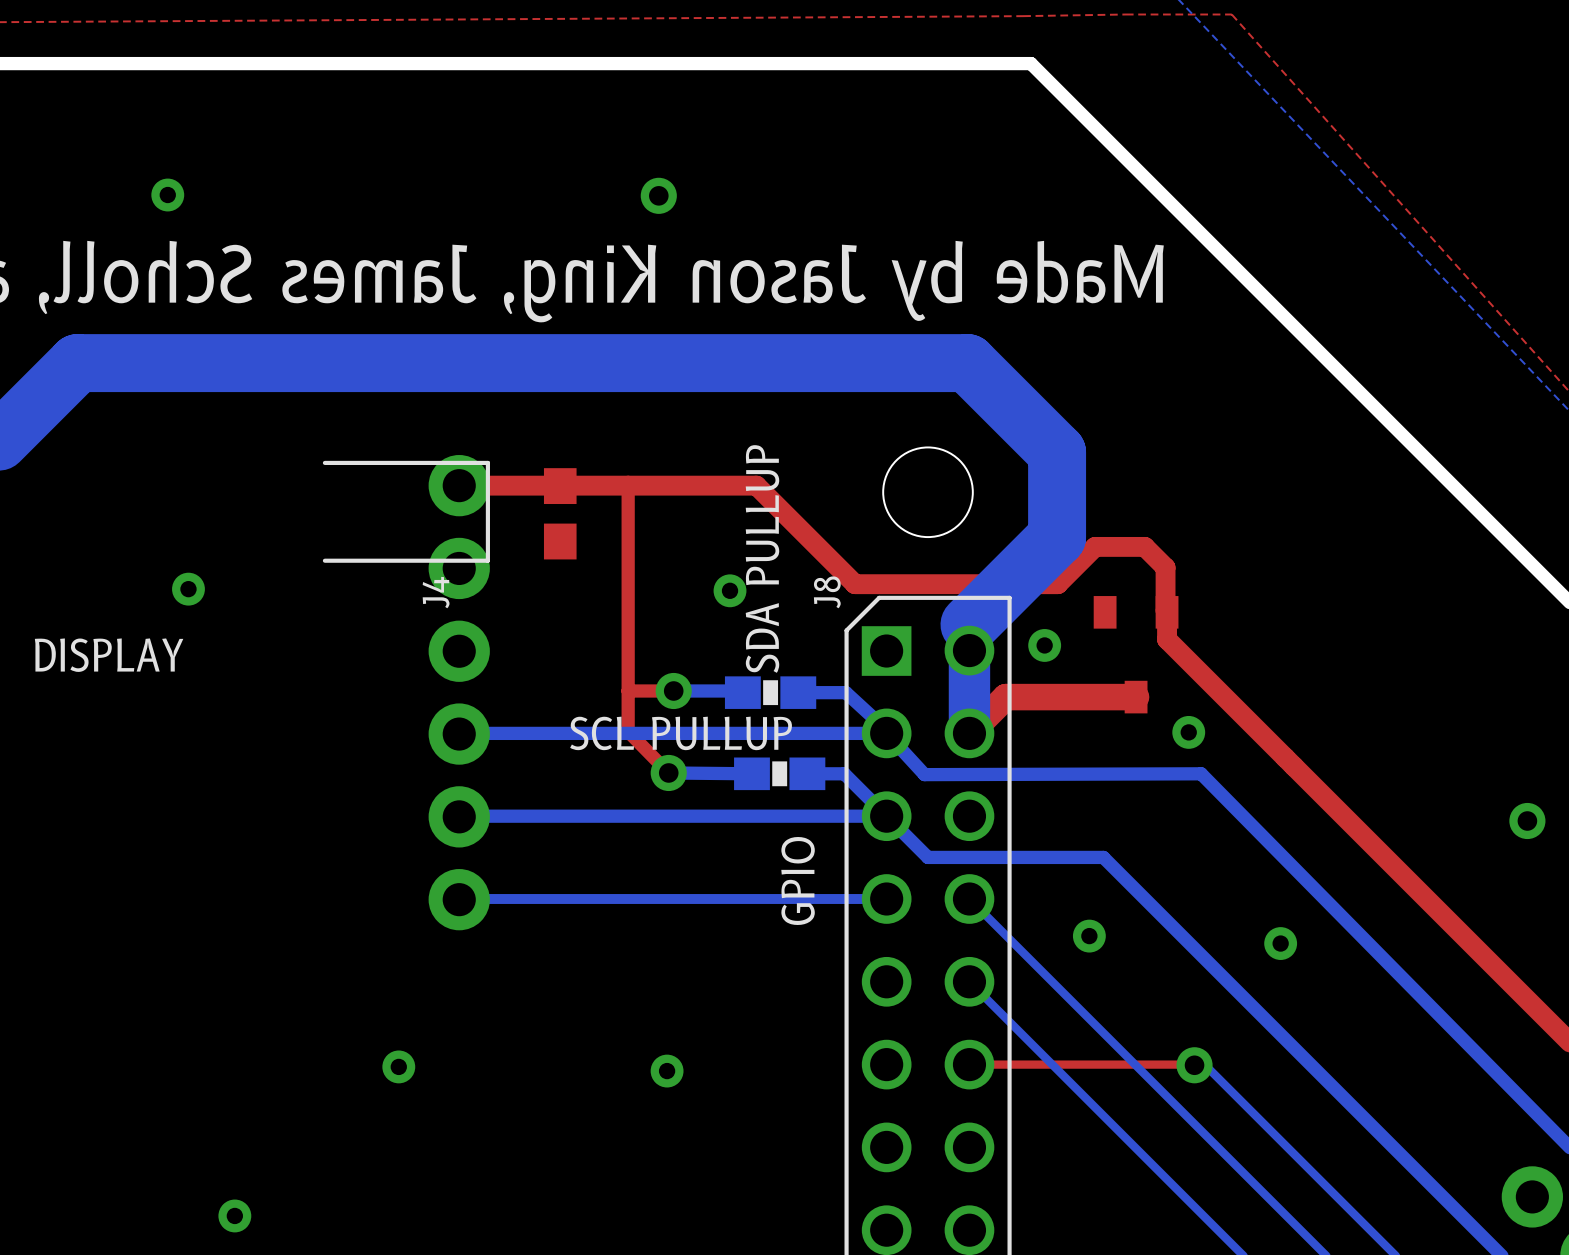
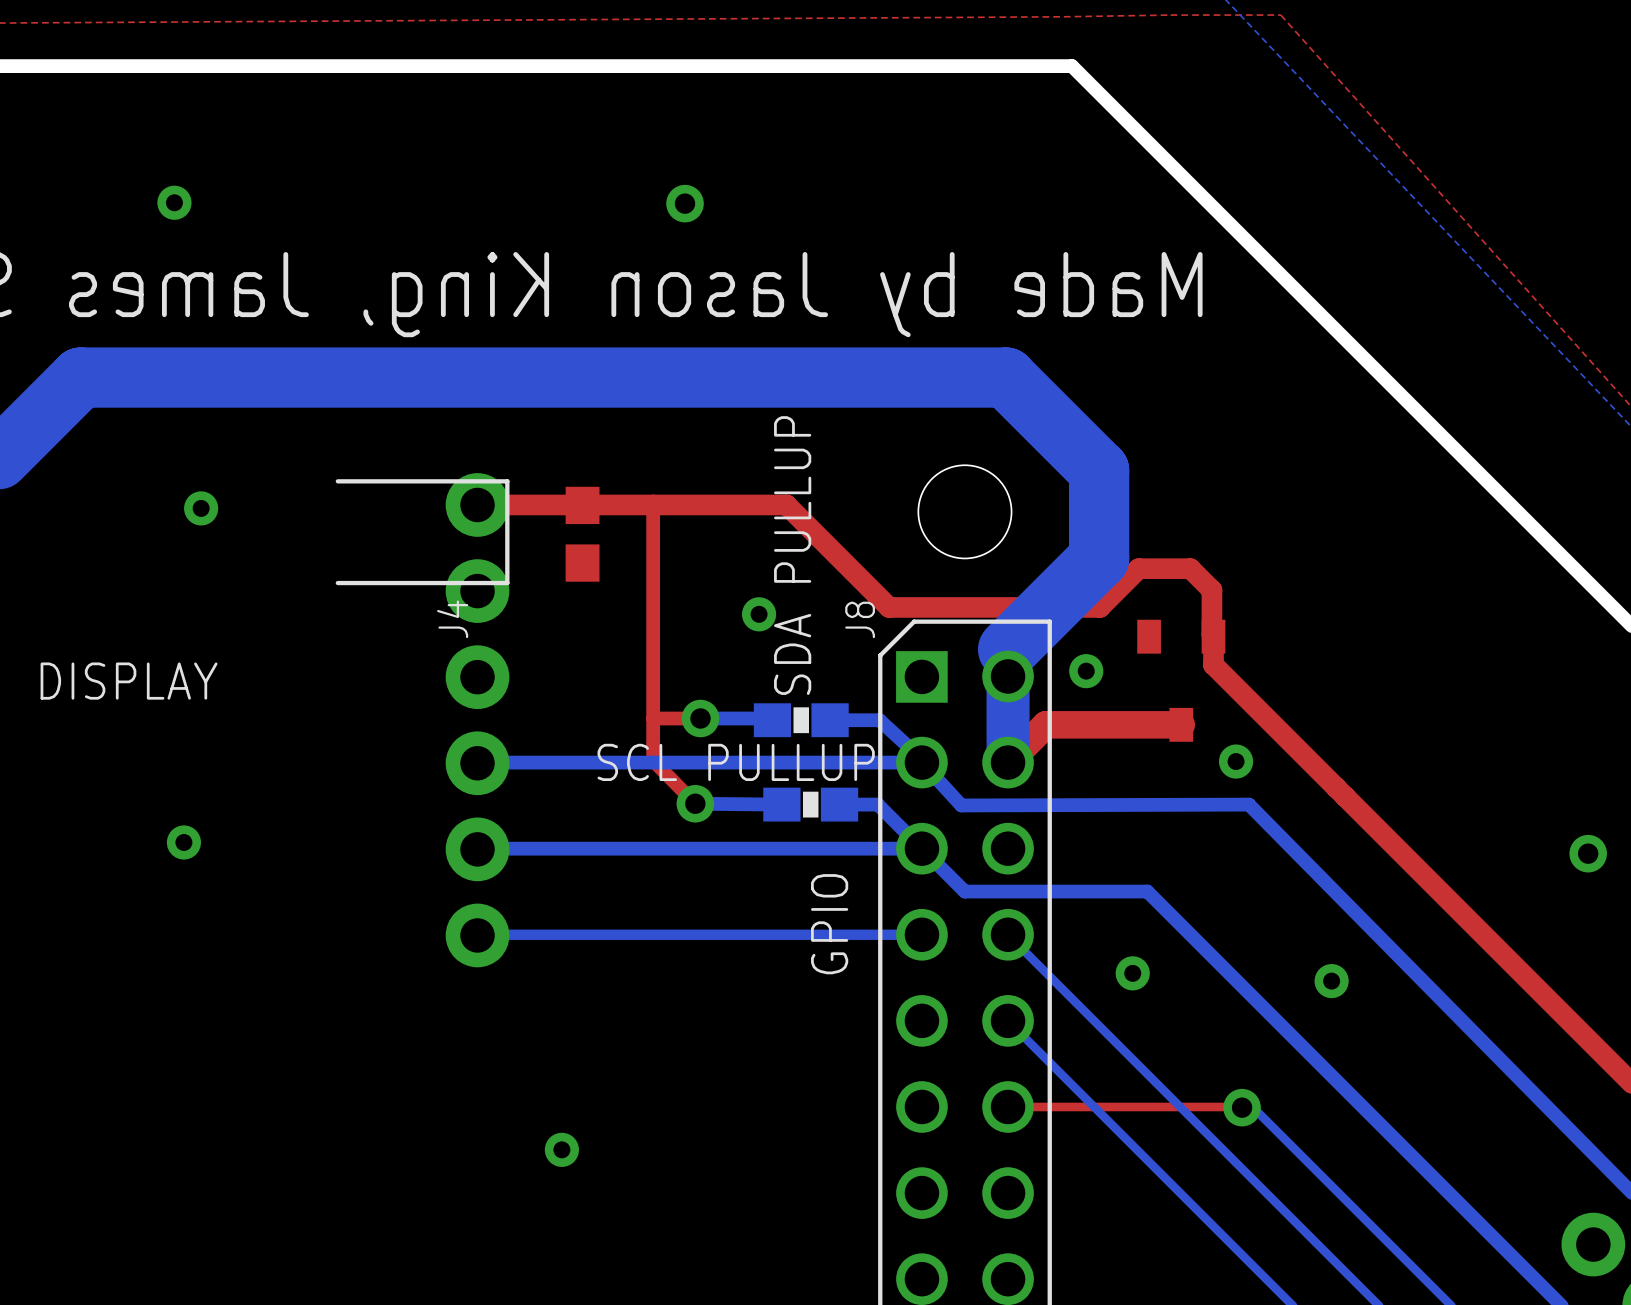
via position: (188, 589) -> (201, 508)
via: none -> (183, 842)
via: (398, 1066) -> none
via: (667, 1071) -> none
via: none -> (561, 1149)
via: (234, 1215) -> none

